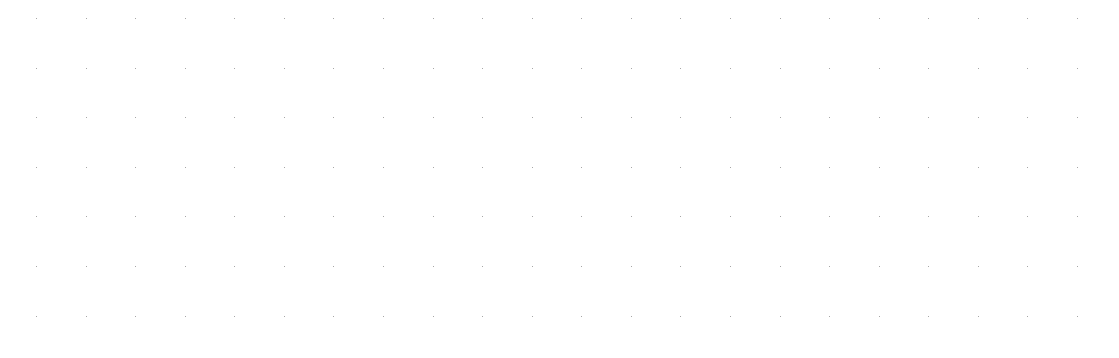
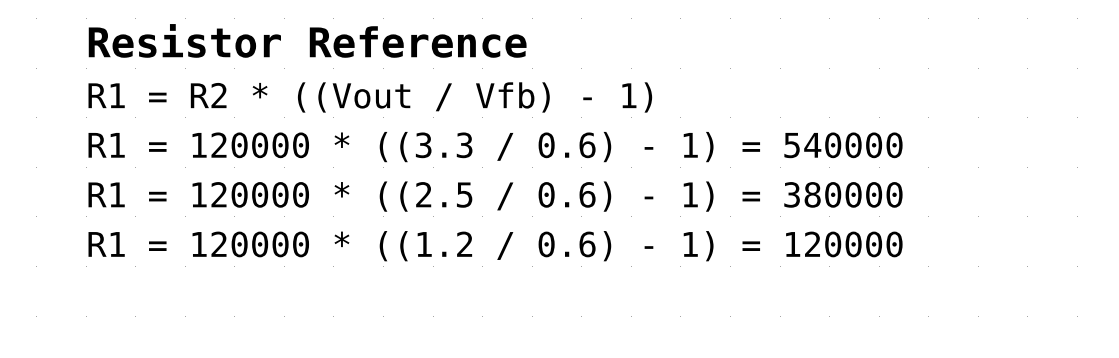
label: none -> Resistor Reference (307, 40)
label: none -> R1 = R2 * ((Vout / Vfb) - 1) (370, 97)
label: none -> R1 = 120000 * ((3.3 / 0.6) - 1) = 540000 (495, 147)
label: none -> R1 = 120000 * ((2.5 / 0.6) - 1) = 380000 (495, 196)
label: none -> R1 = 120000 * ((1.2 / 0.6) - 1) = 120000 (495, 246)

